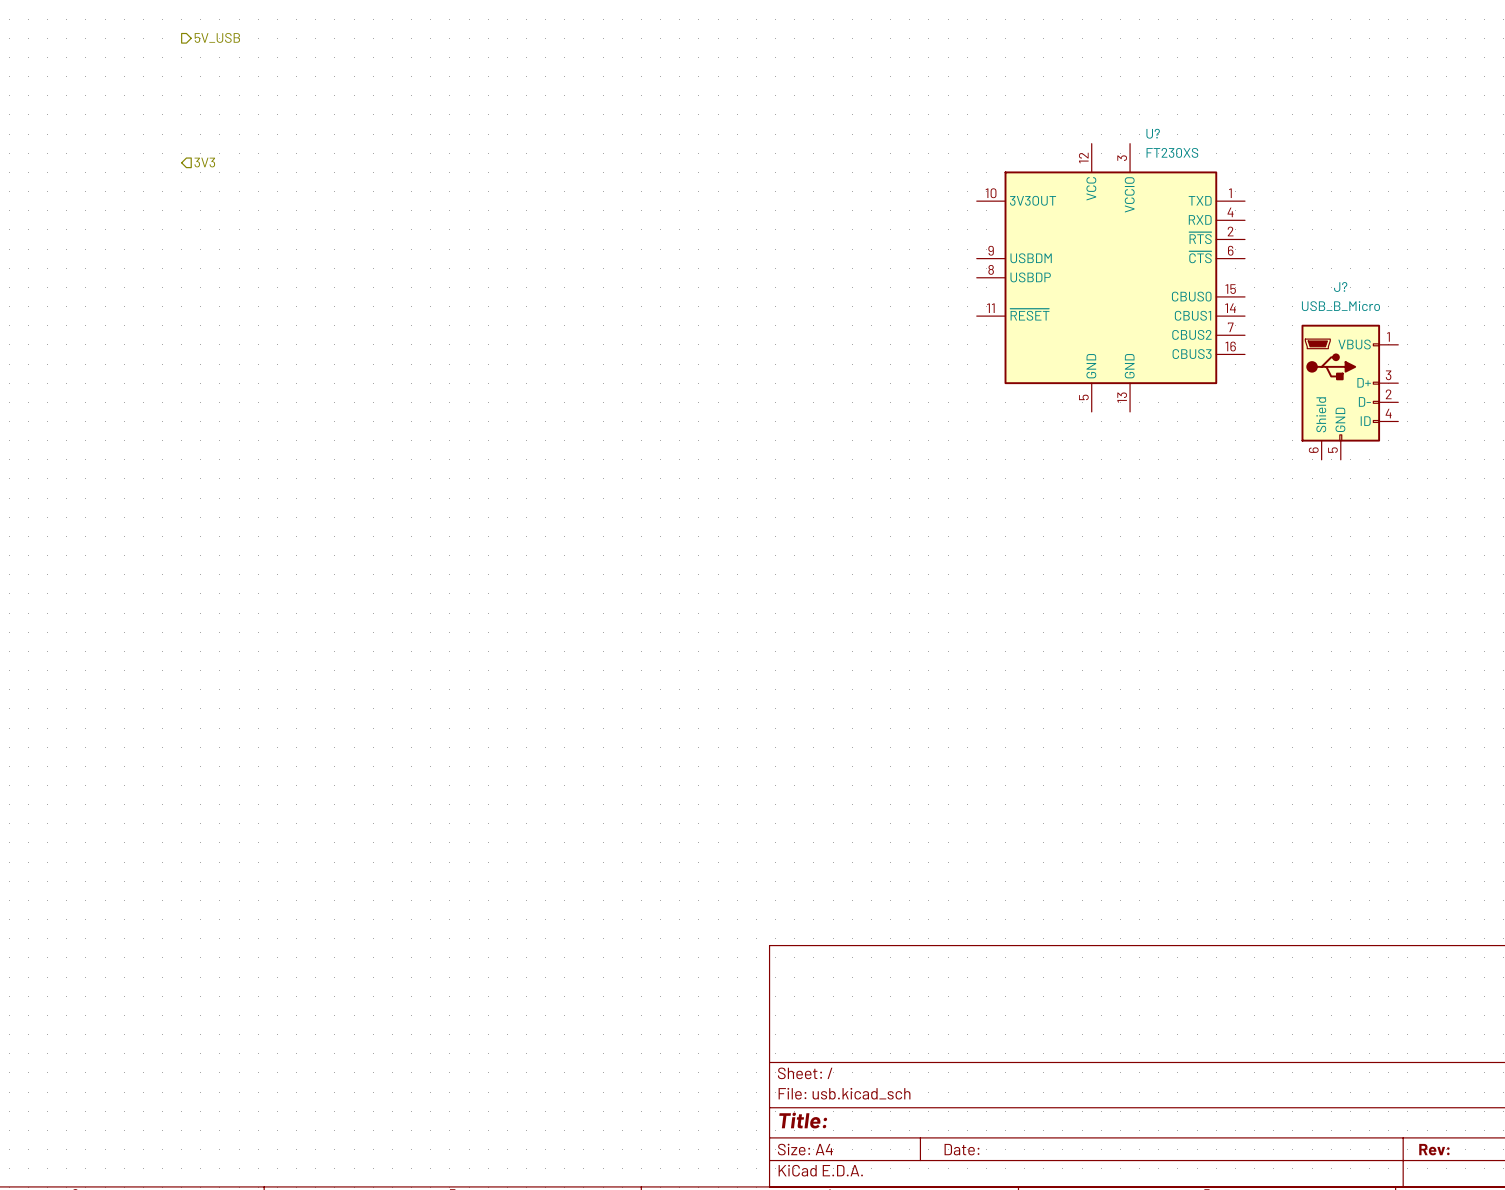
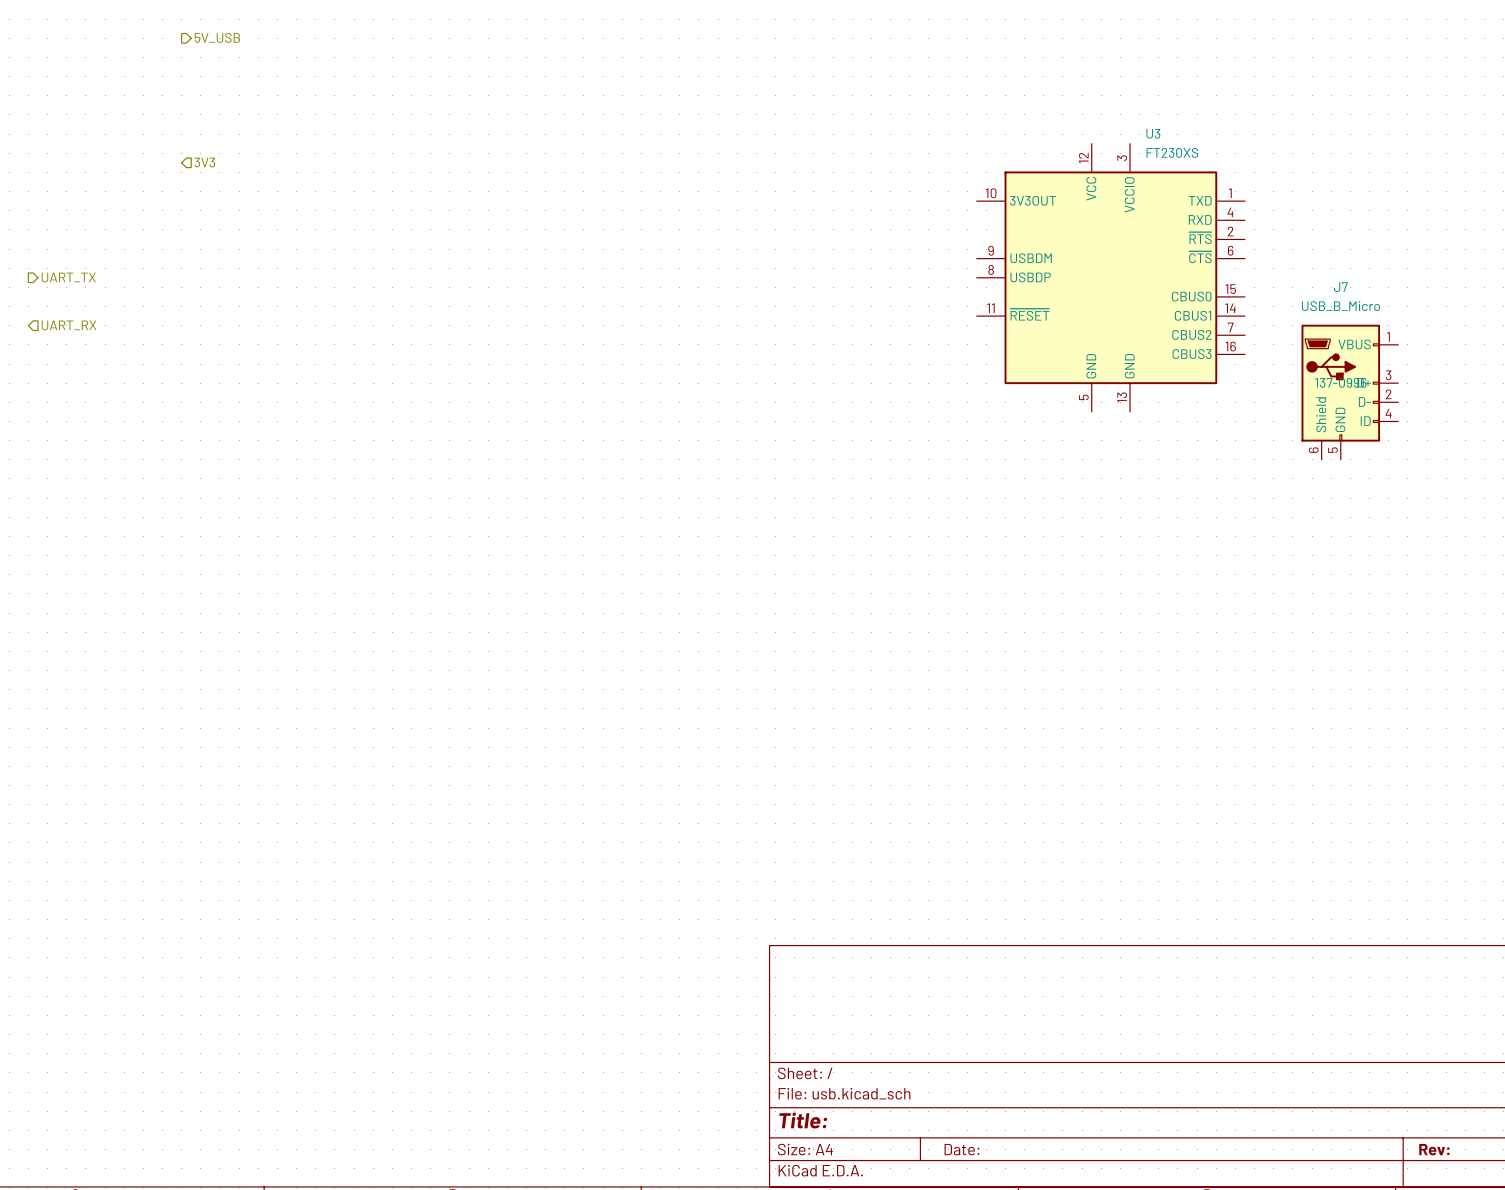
U? name: U? (1153, 133) -> U3 (1153, 133)
hierarchical label: none -> UART_TX (68, 277)
J? name: J? (1340, 286) -> J7 (1340, 287)
hierarchical label: none -> UART_RX (69, 325)
J? text: none -> 137-0996 (1340, 382)

